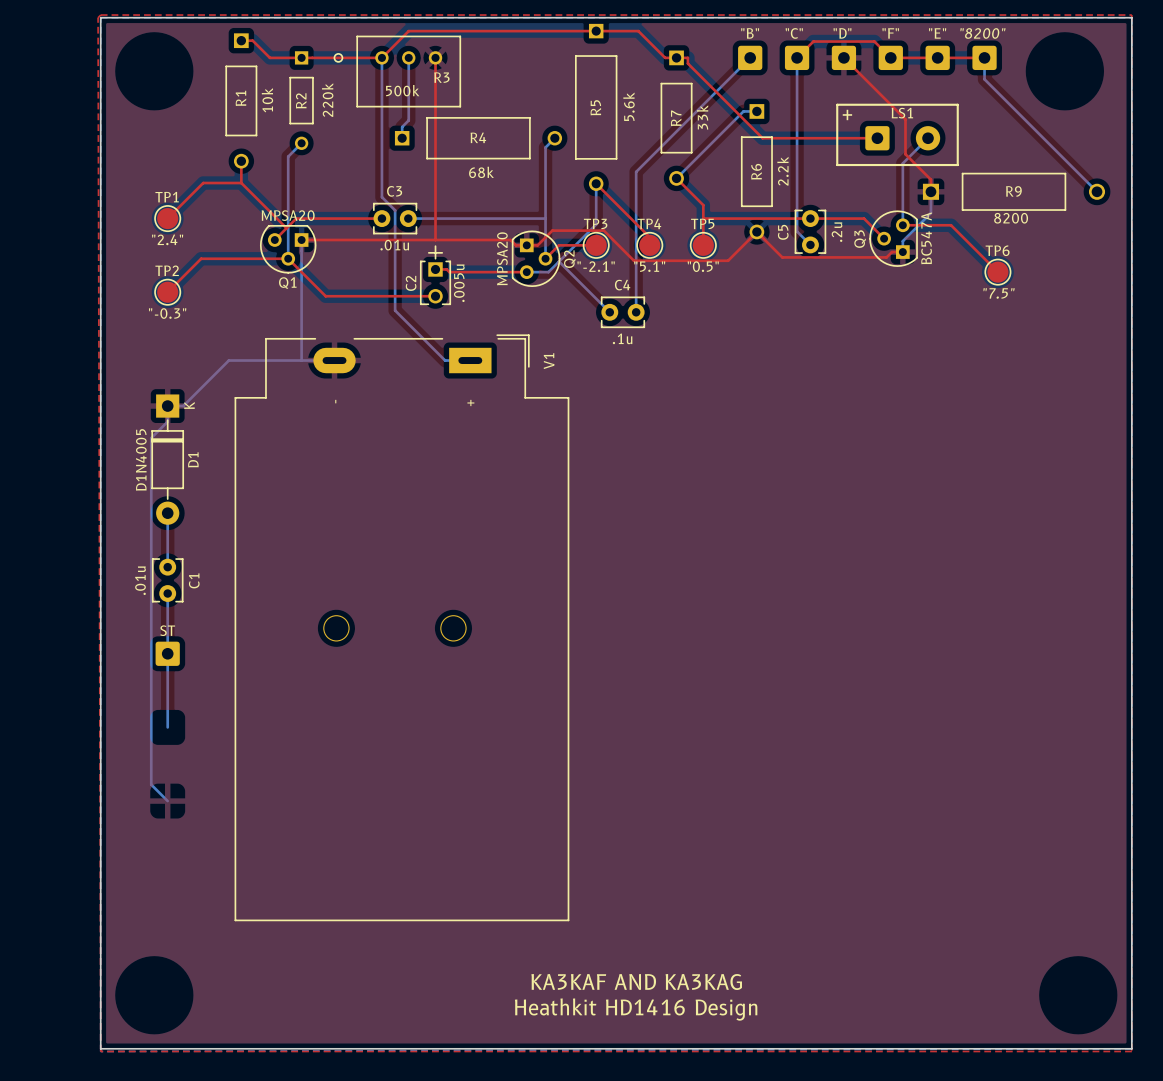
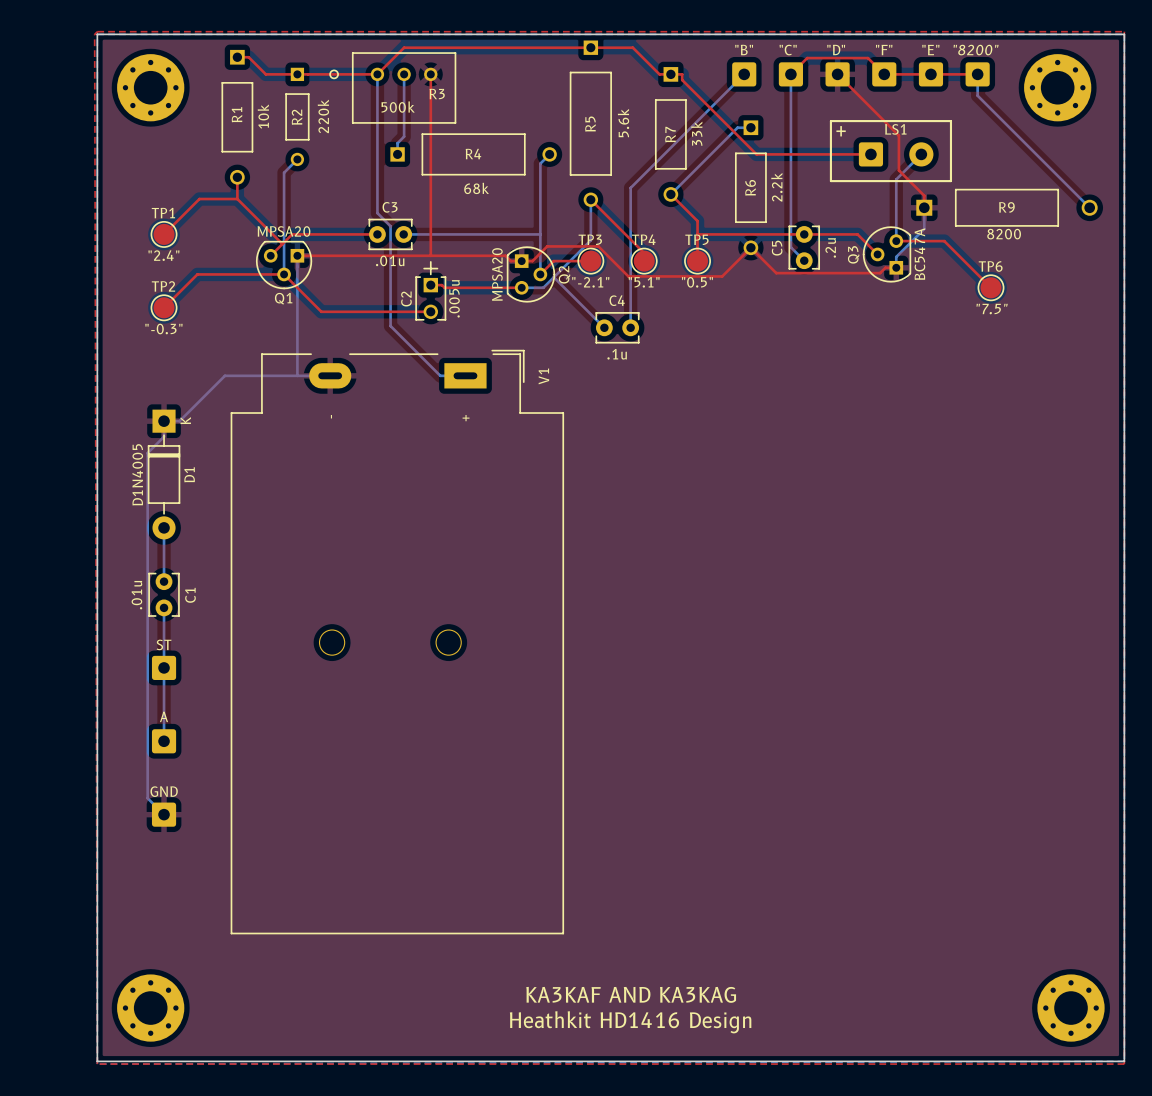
part: none -> (150, 87)
part: none -> (1057, 87)
part: none -> A (164, 741)
part: none -> GND (164, 814)
part: none -> (150, 1008)
part: none -> (1071, 1008)

